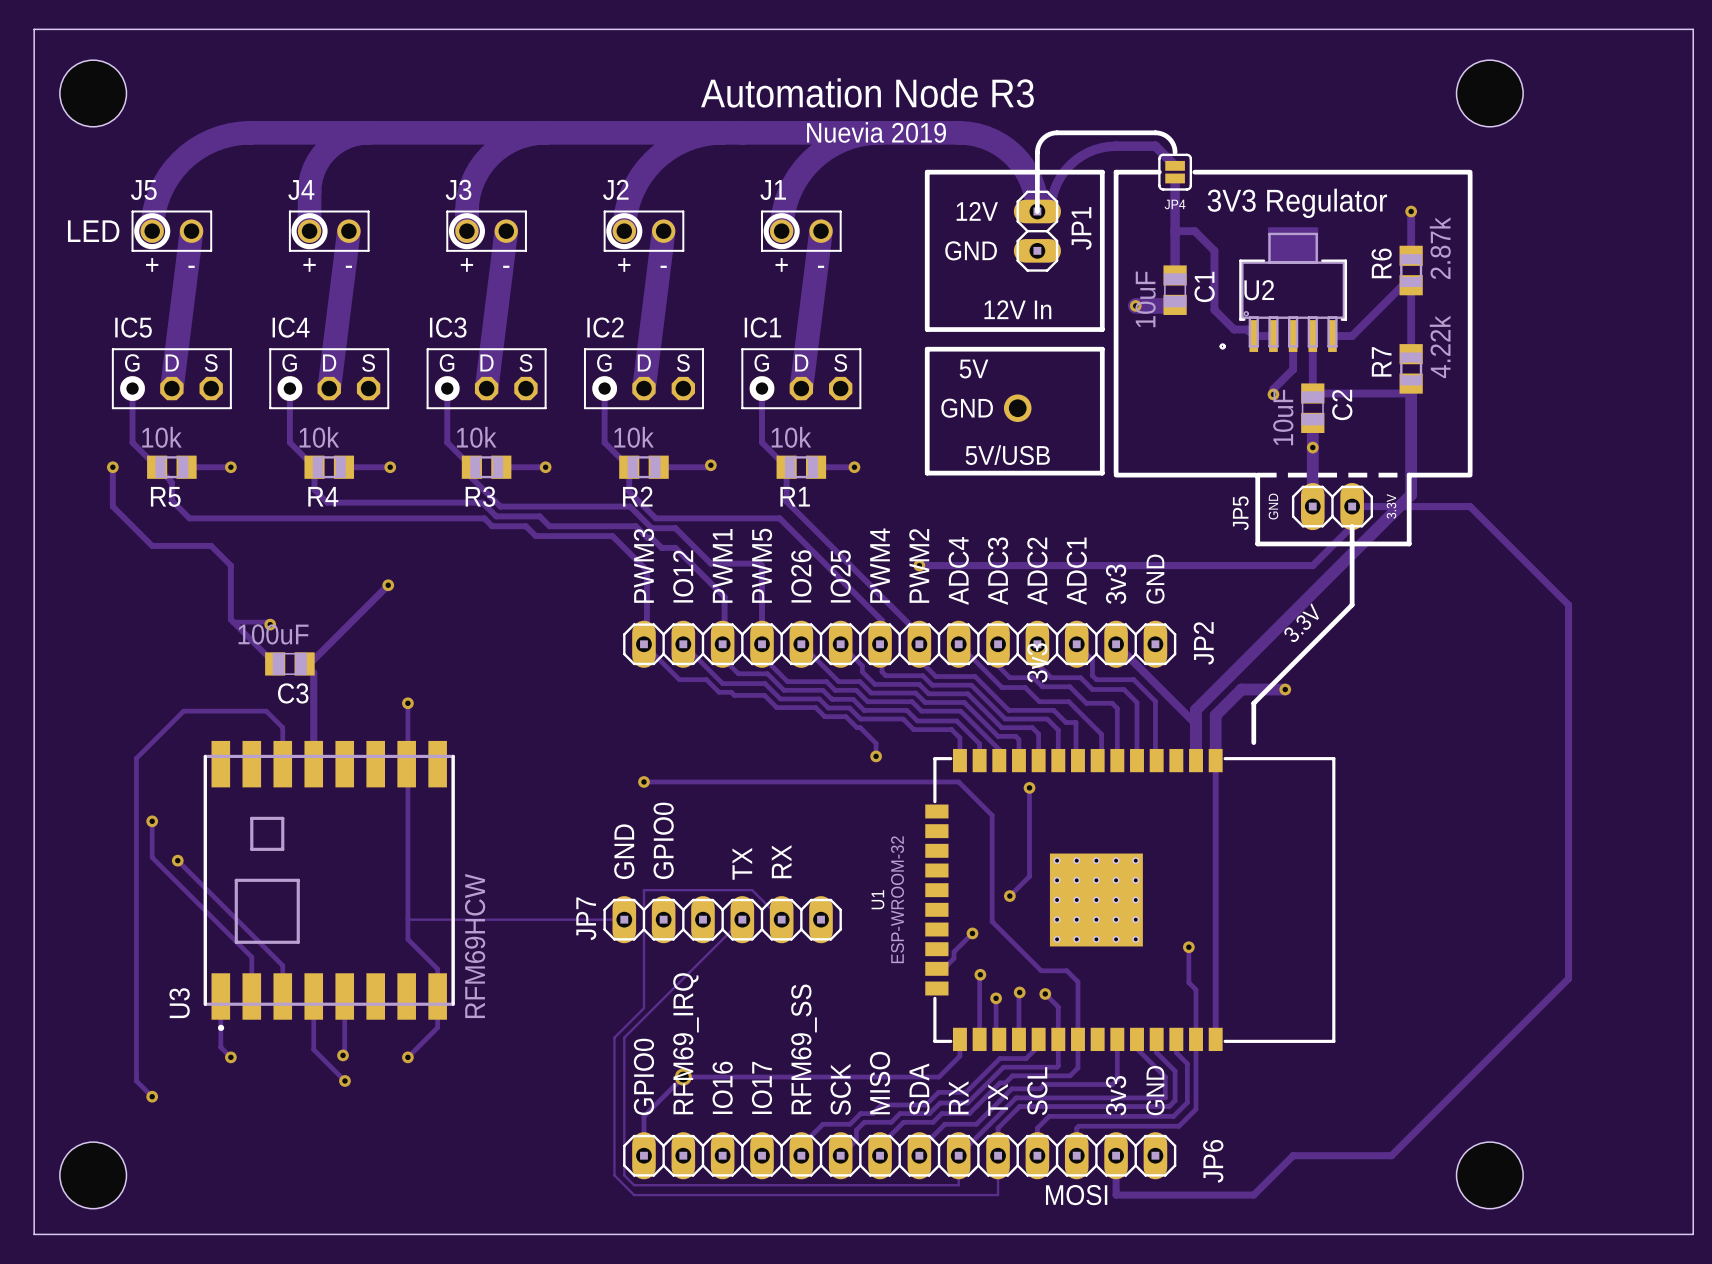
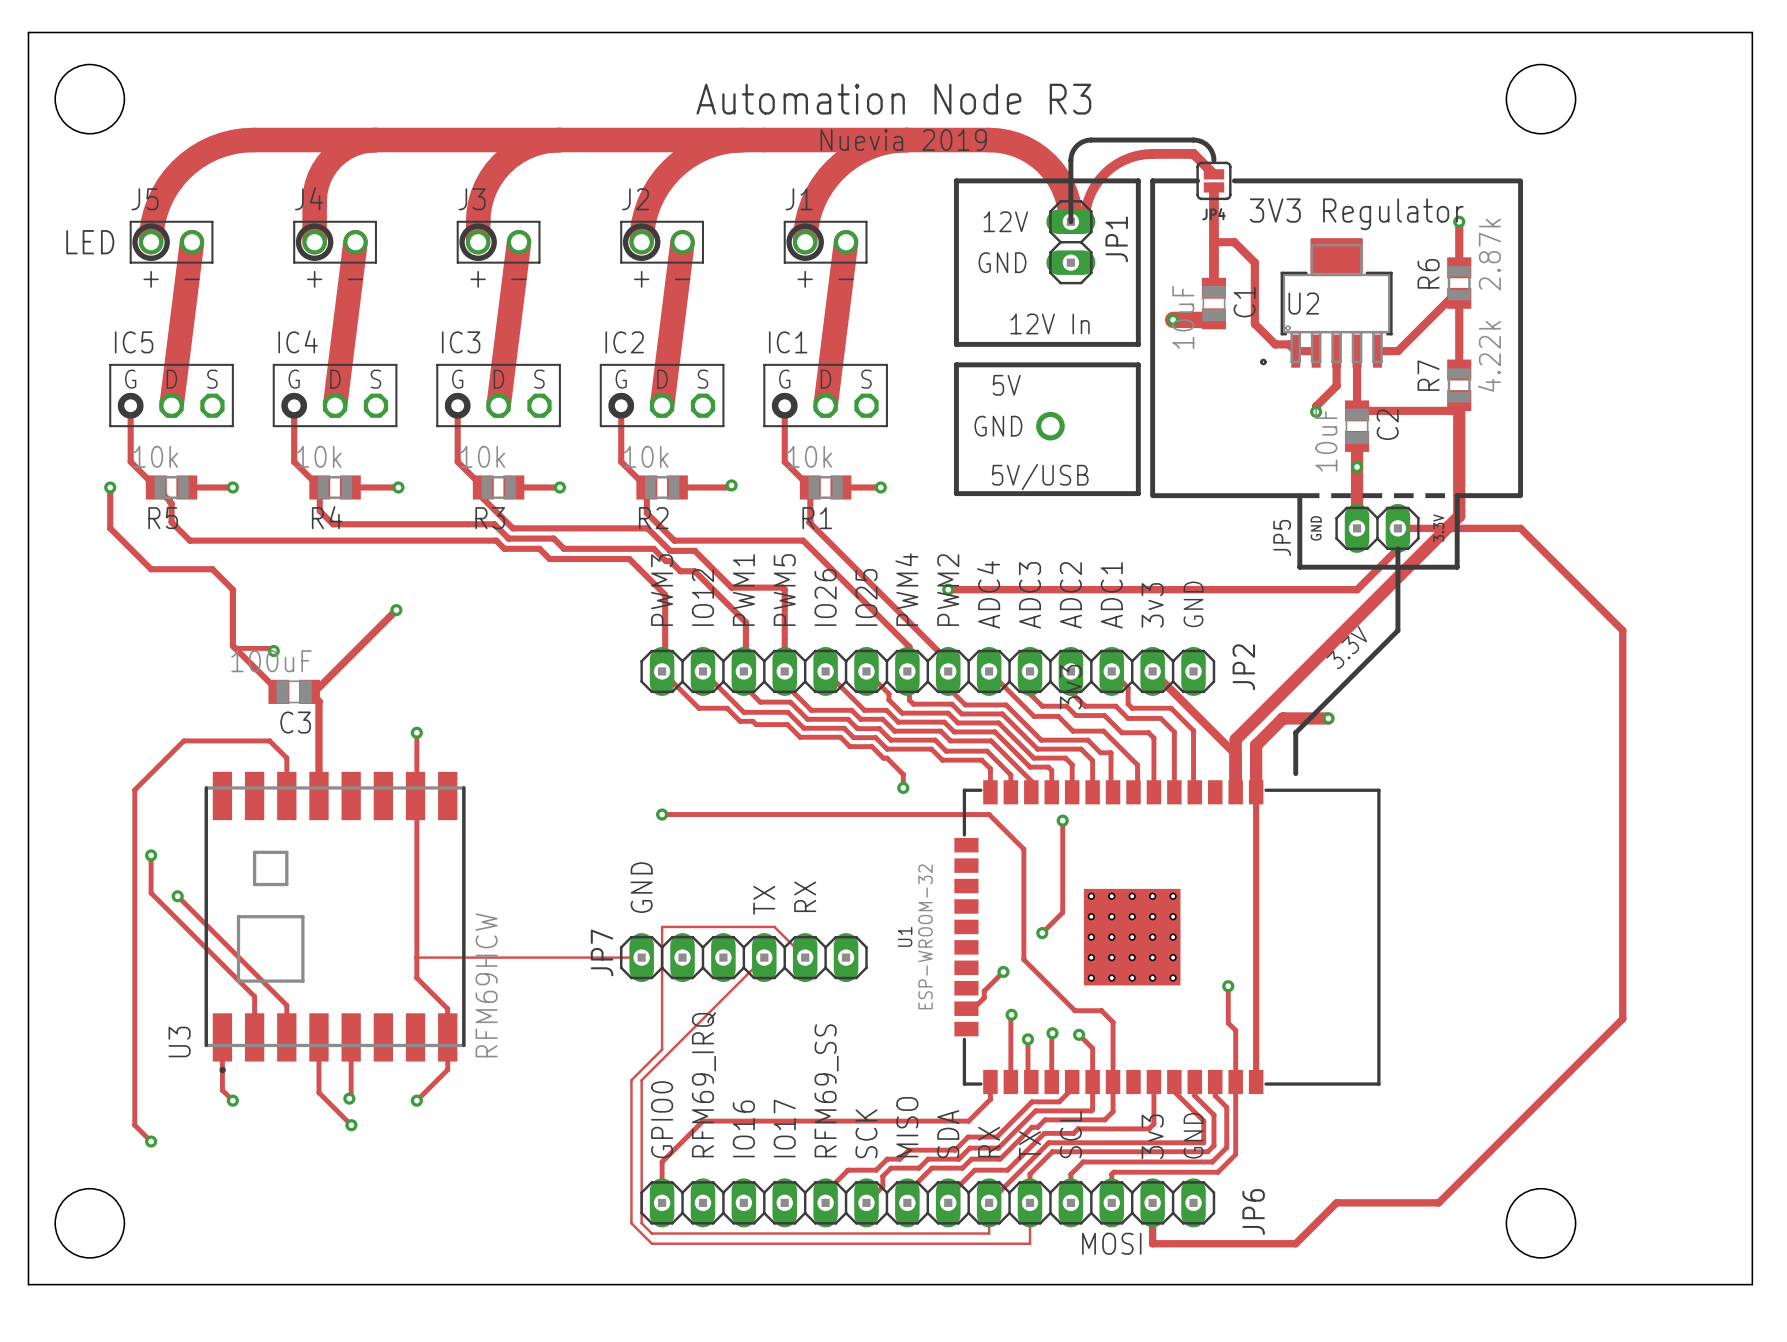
text: GPIO0 (663, 840) -> none
via: (683, 1077) -> none

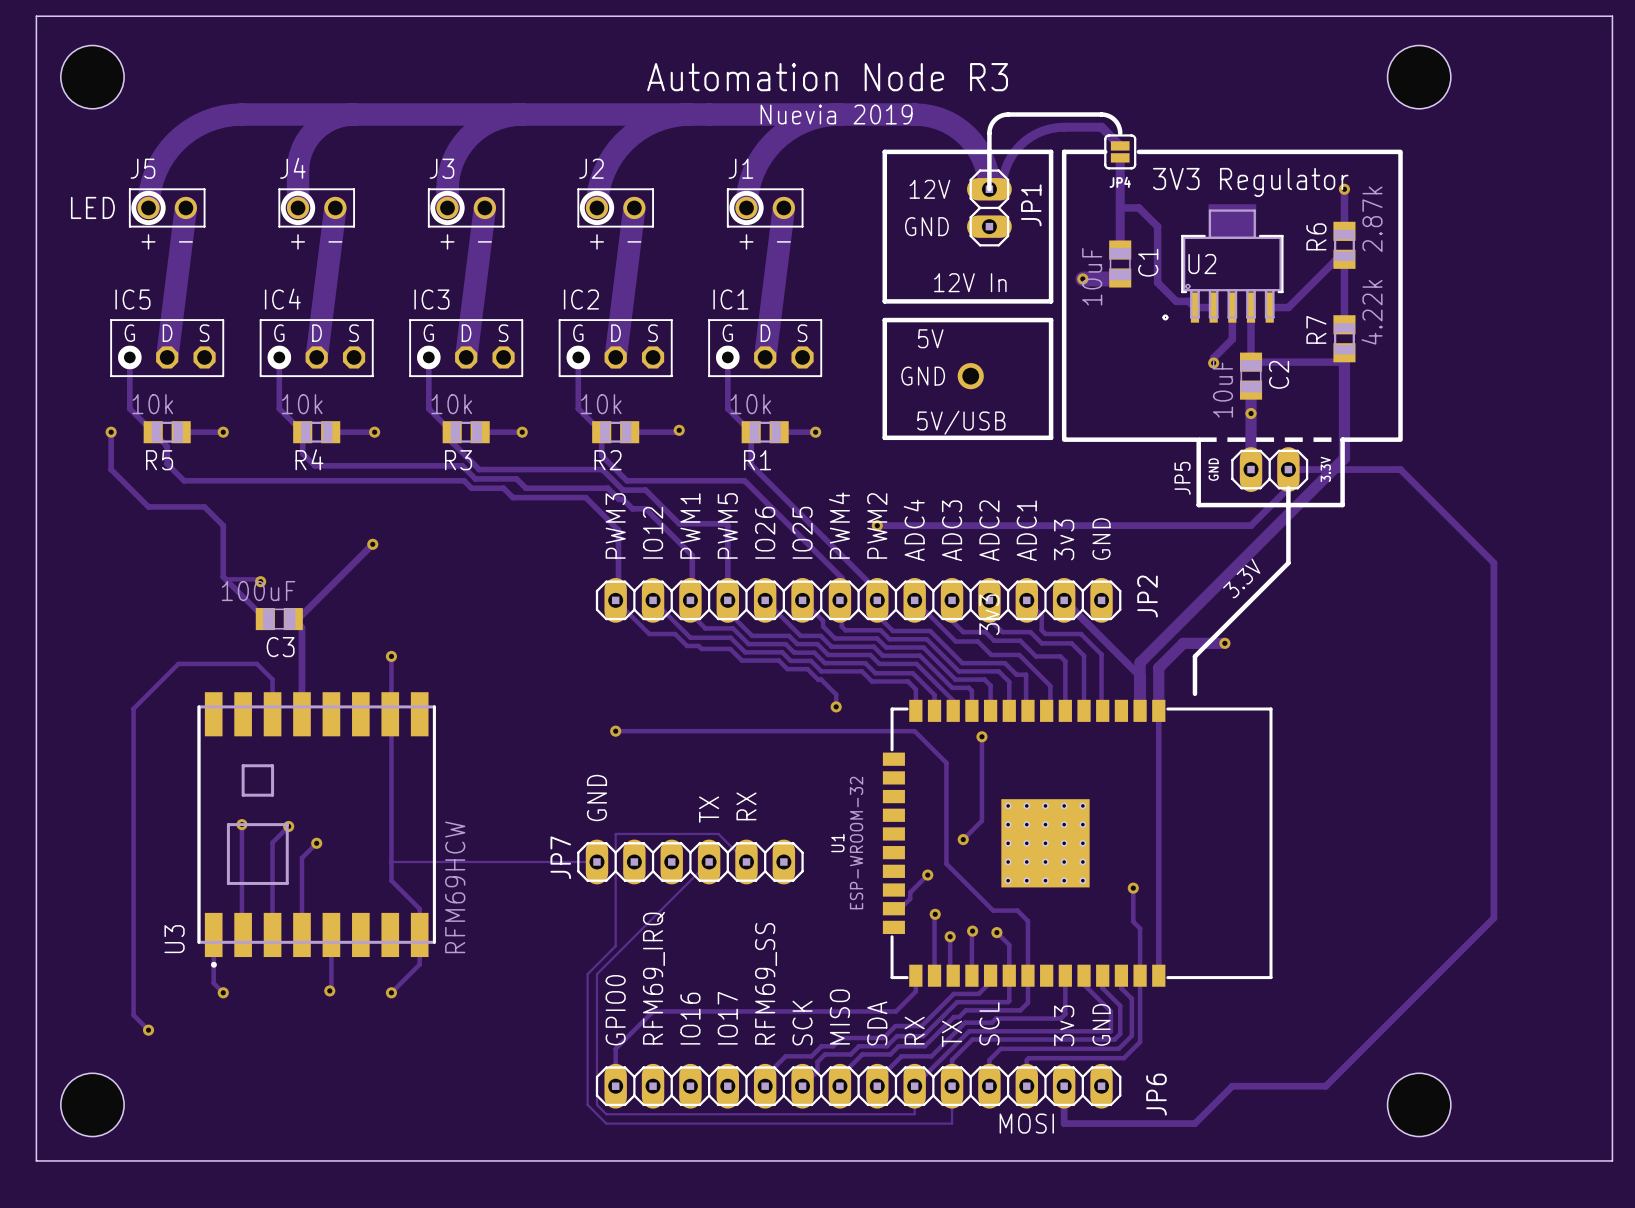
track: (151, 855) (151, 893) (254, 996) (254, 1037) -> (241, 824) (243, 934)
via: (151, 855) -> none
track: (177, 896) (286, 1005) -> (288, 826) (272, 842) (272, 905)
via: (177, 896) -> none
via: none -> (241, 824)
via: none -> (288, 826)
via: none -> (316, 843)
track: (318, 1037) (318, 1092) (351, 1125) -> (301, 934) (301, 858) (316, 843)
via: (351, 1125) -> none

